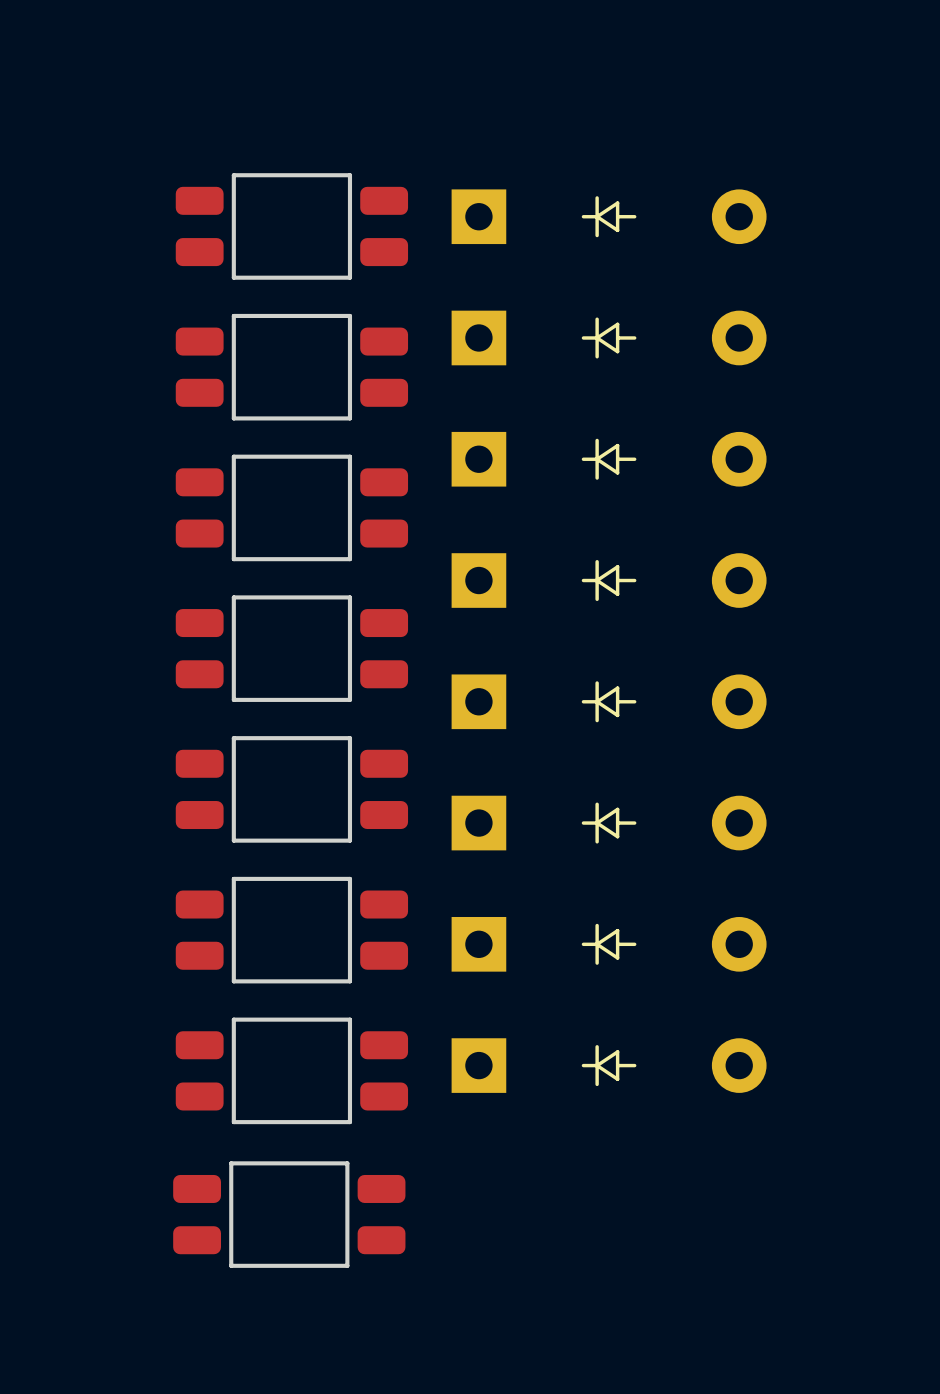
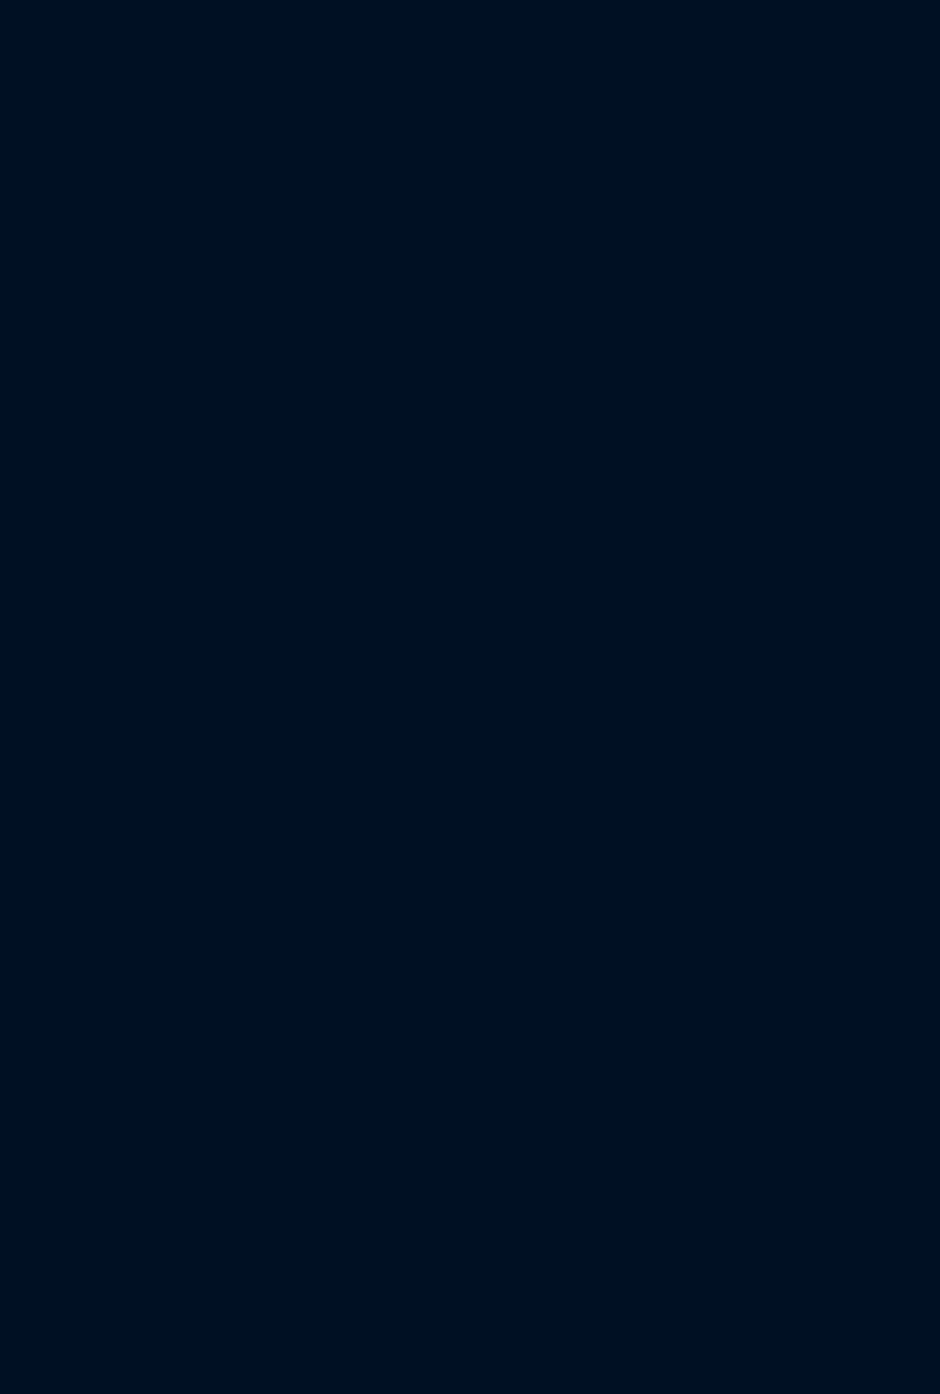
part: (609, 216) -> none
part: (291, 226) -> none
part: (609, 337) -> none
part: (291, 367) -> none
part: (609, 459) -> none
part: (291, 507) -> none
part: (609, 580) -> none
part: (291, 648) -> none
part: (609, 701) -> none
part: (291, 789) -> none
part: (609, 823) -> none
part: (291, 930) -> none
part: (609, 944) -> none
part: (609, 1065) -> none
part: (291, 1070) -> none
part: (289, 1214) -> none

